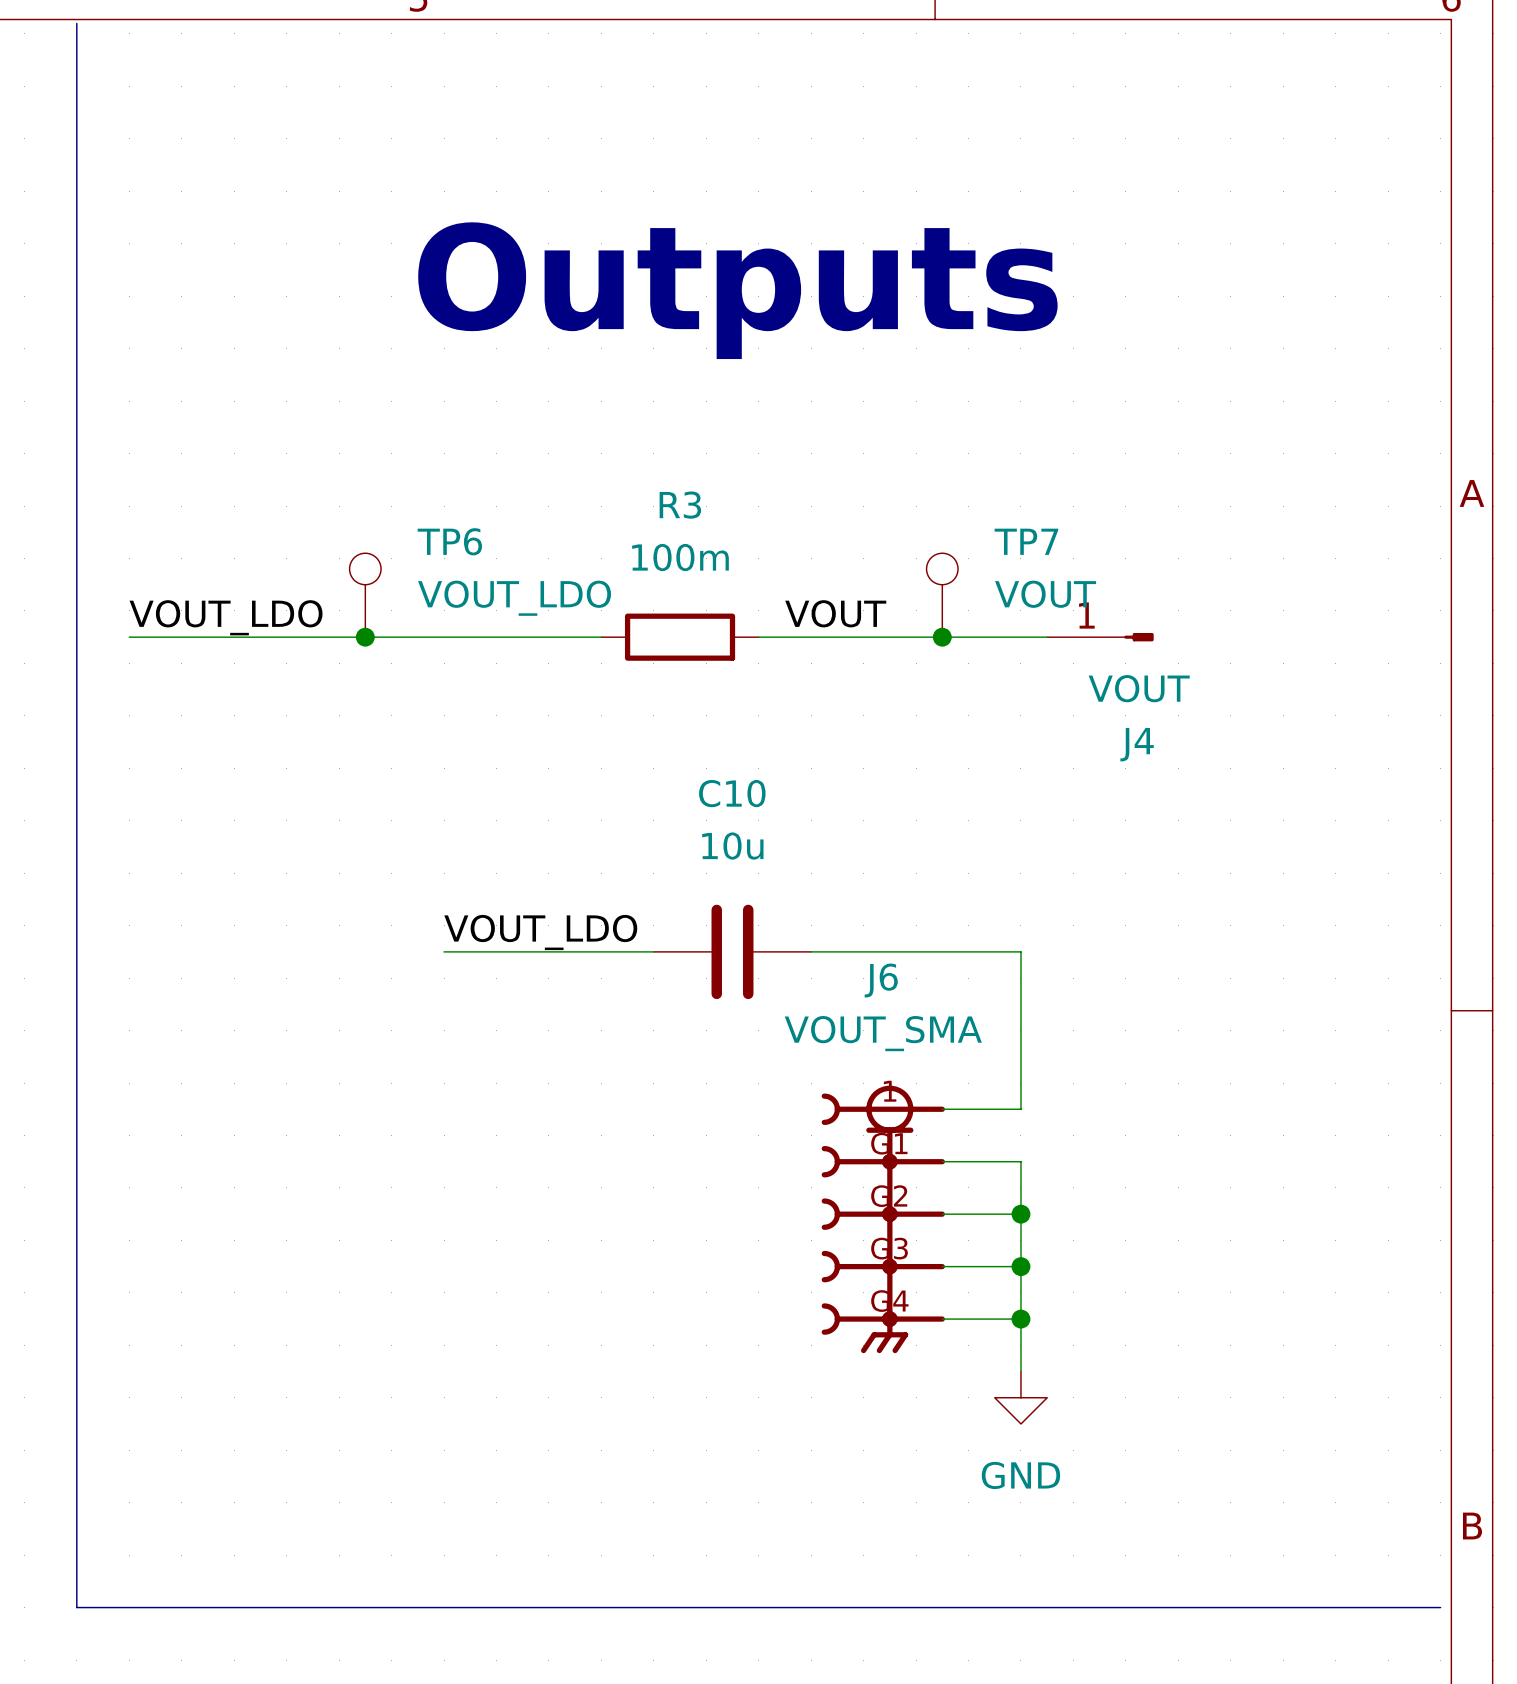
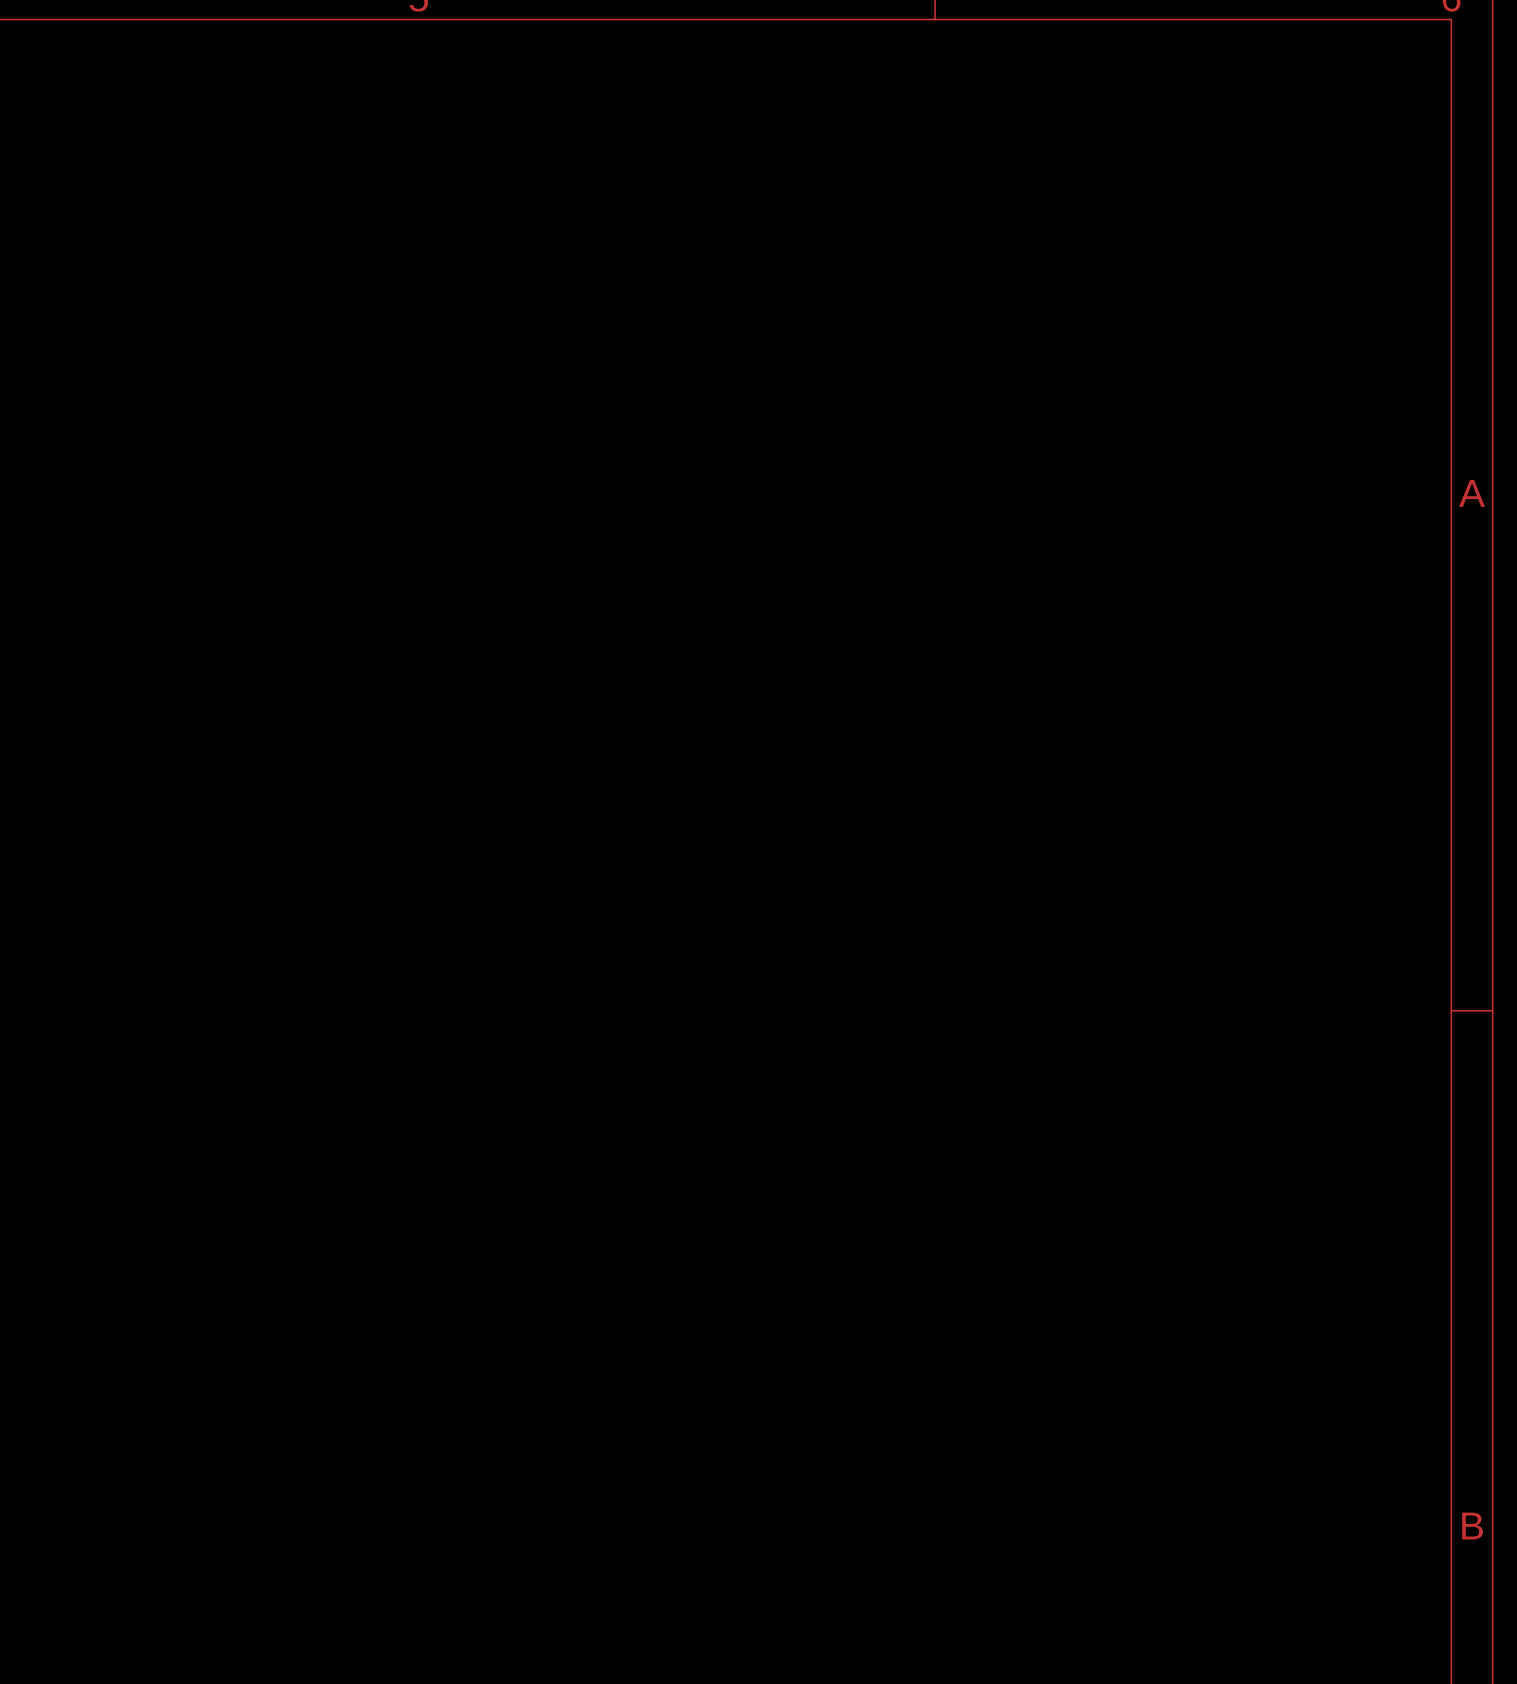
line: (76, 23) (76, 1607) (1440, 1607) -> none
text: Outputs (737, 290) -> none
TP6: VOUT_LDO (365, 595) -> none
TP7: VOUT (942, 595) -> none
label: VOUT (835, 613) -> none
label: VOUT_LDO (226, 617) -> none
wire: (129, 637) (601, 637) -> none
junction: (365, 637) -> none
R3: 100m (680, 637) -> none
wire: (758, 637) (1047, 637) -> none
junction: (942, 637) -> none
J4: VOUT (1100, 637) -> none
label: VOUT_LDO (540, 932) -> none
wire: (444, 951) (653, 951) -> none
C10: 10u (732, 951) -> none
wire: (811, 951) (1020, 951) (1020, 1109) (942, 1109) -> none
wire: (942, 1161) (1020, 1161) (1020, 1371) -> none
wire: (942, 1214) (1020, 1214) -> none
junction: (1020, 1214) -> none
J6: VOUT_SMA (883, 1219) -> none
wire: (942, 1266) (1020, 1266) -> none
junction: (1020, 1266) -> none
wire: (942, 1319) (1020, 1319) -> none
junction: (1020, 1319) -> none
power symbol: GND (1020, 1397) -> none

